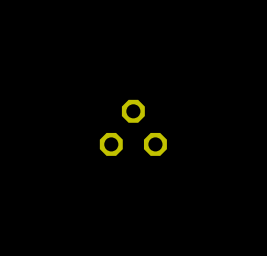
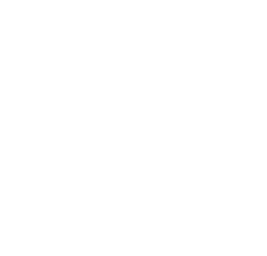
part: (133, 127) -> none

